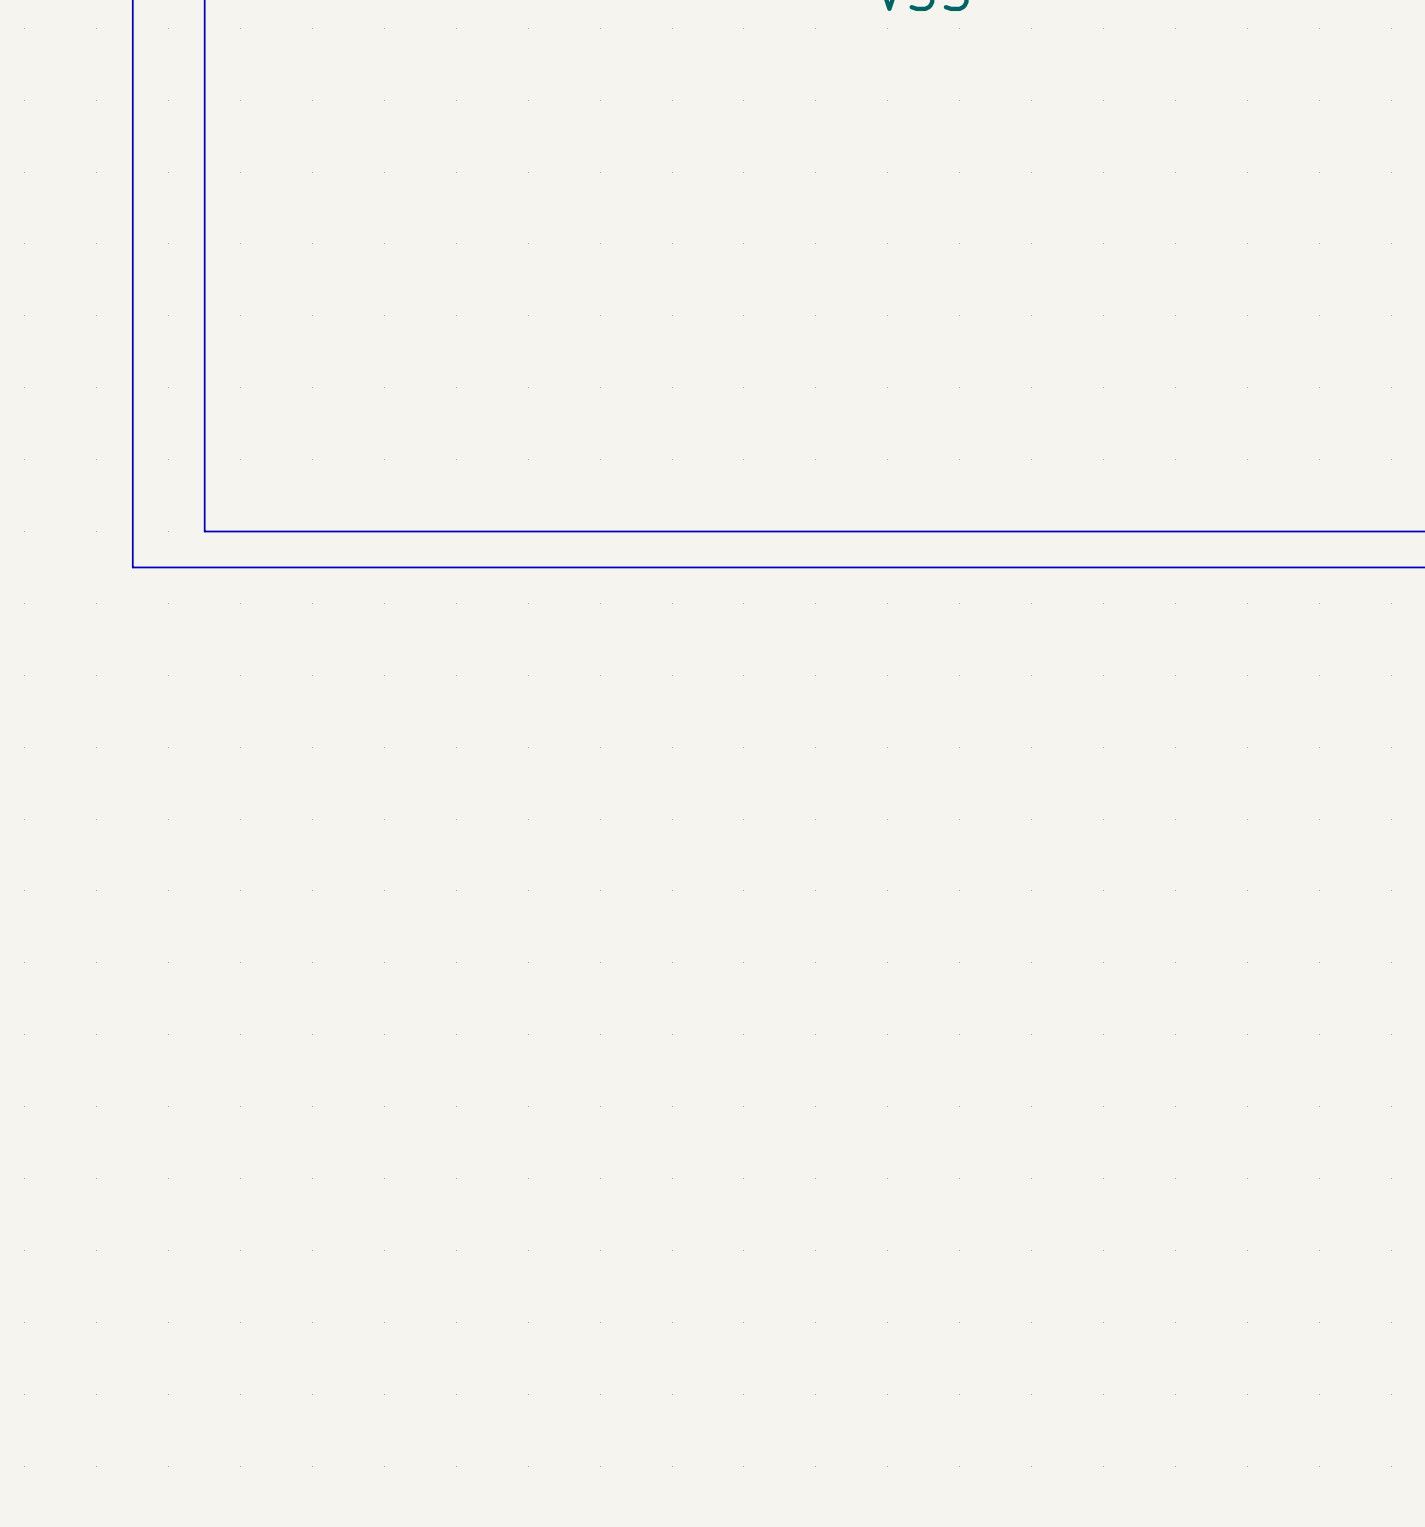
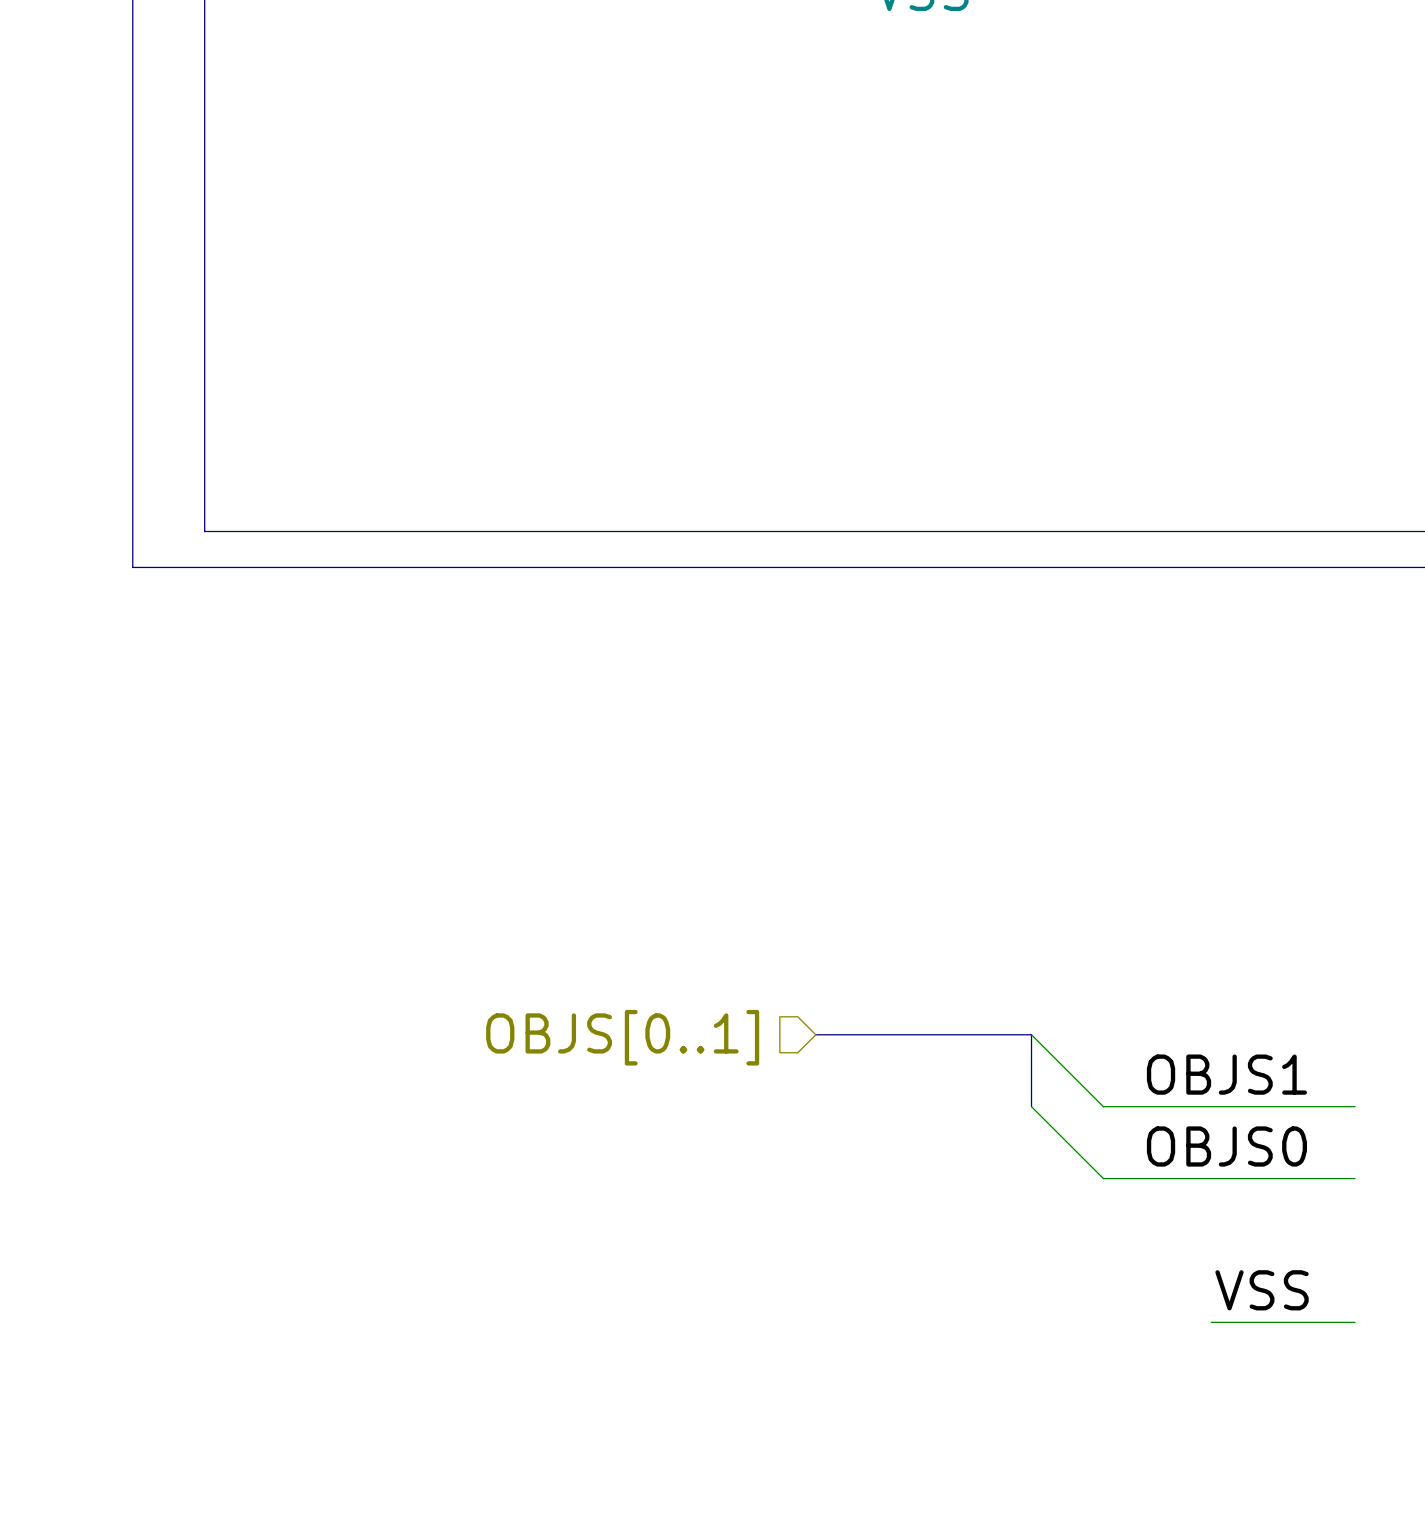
bus: none -> (815, 1034) (1031, 1034) (1031, 1106)
wire: none -> (1031, 1034) (1103, 1106) (1355, 1106)
hierarchical label: none -> OBJS[0..1] (622, 1037)
label: none -> OBJS1 (1226, 1074)
wire: none -> (1031, 1106) (1103, 1178) (1355, 1178)
label: none -> OBJS0 (1226, 1146)
label: none -> VSS (1262, 1290)
wire: none -> (1211, 1322) (1355, 1322)

